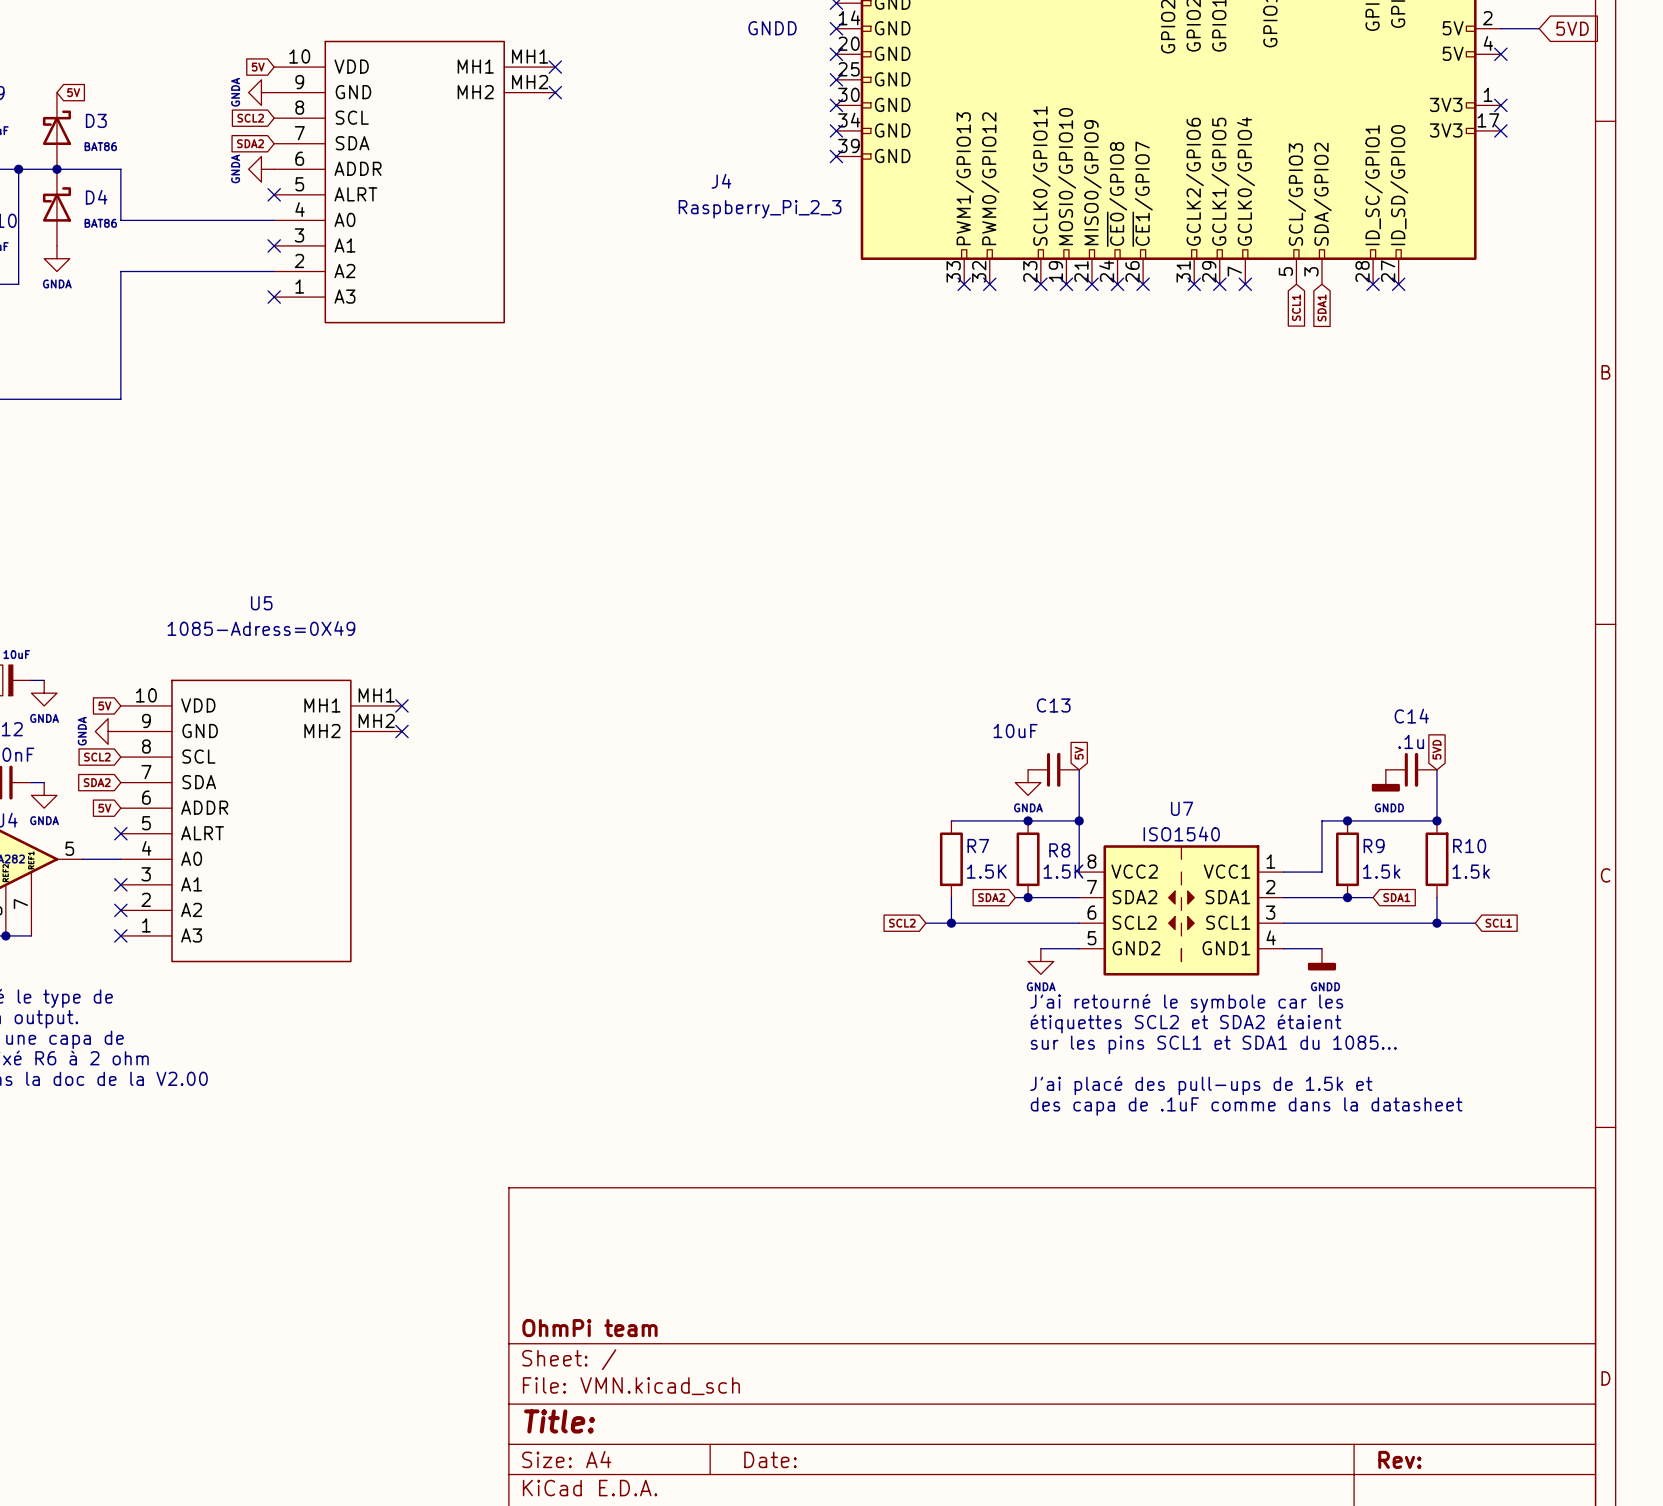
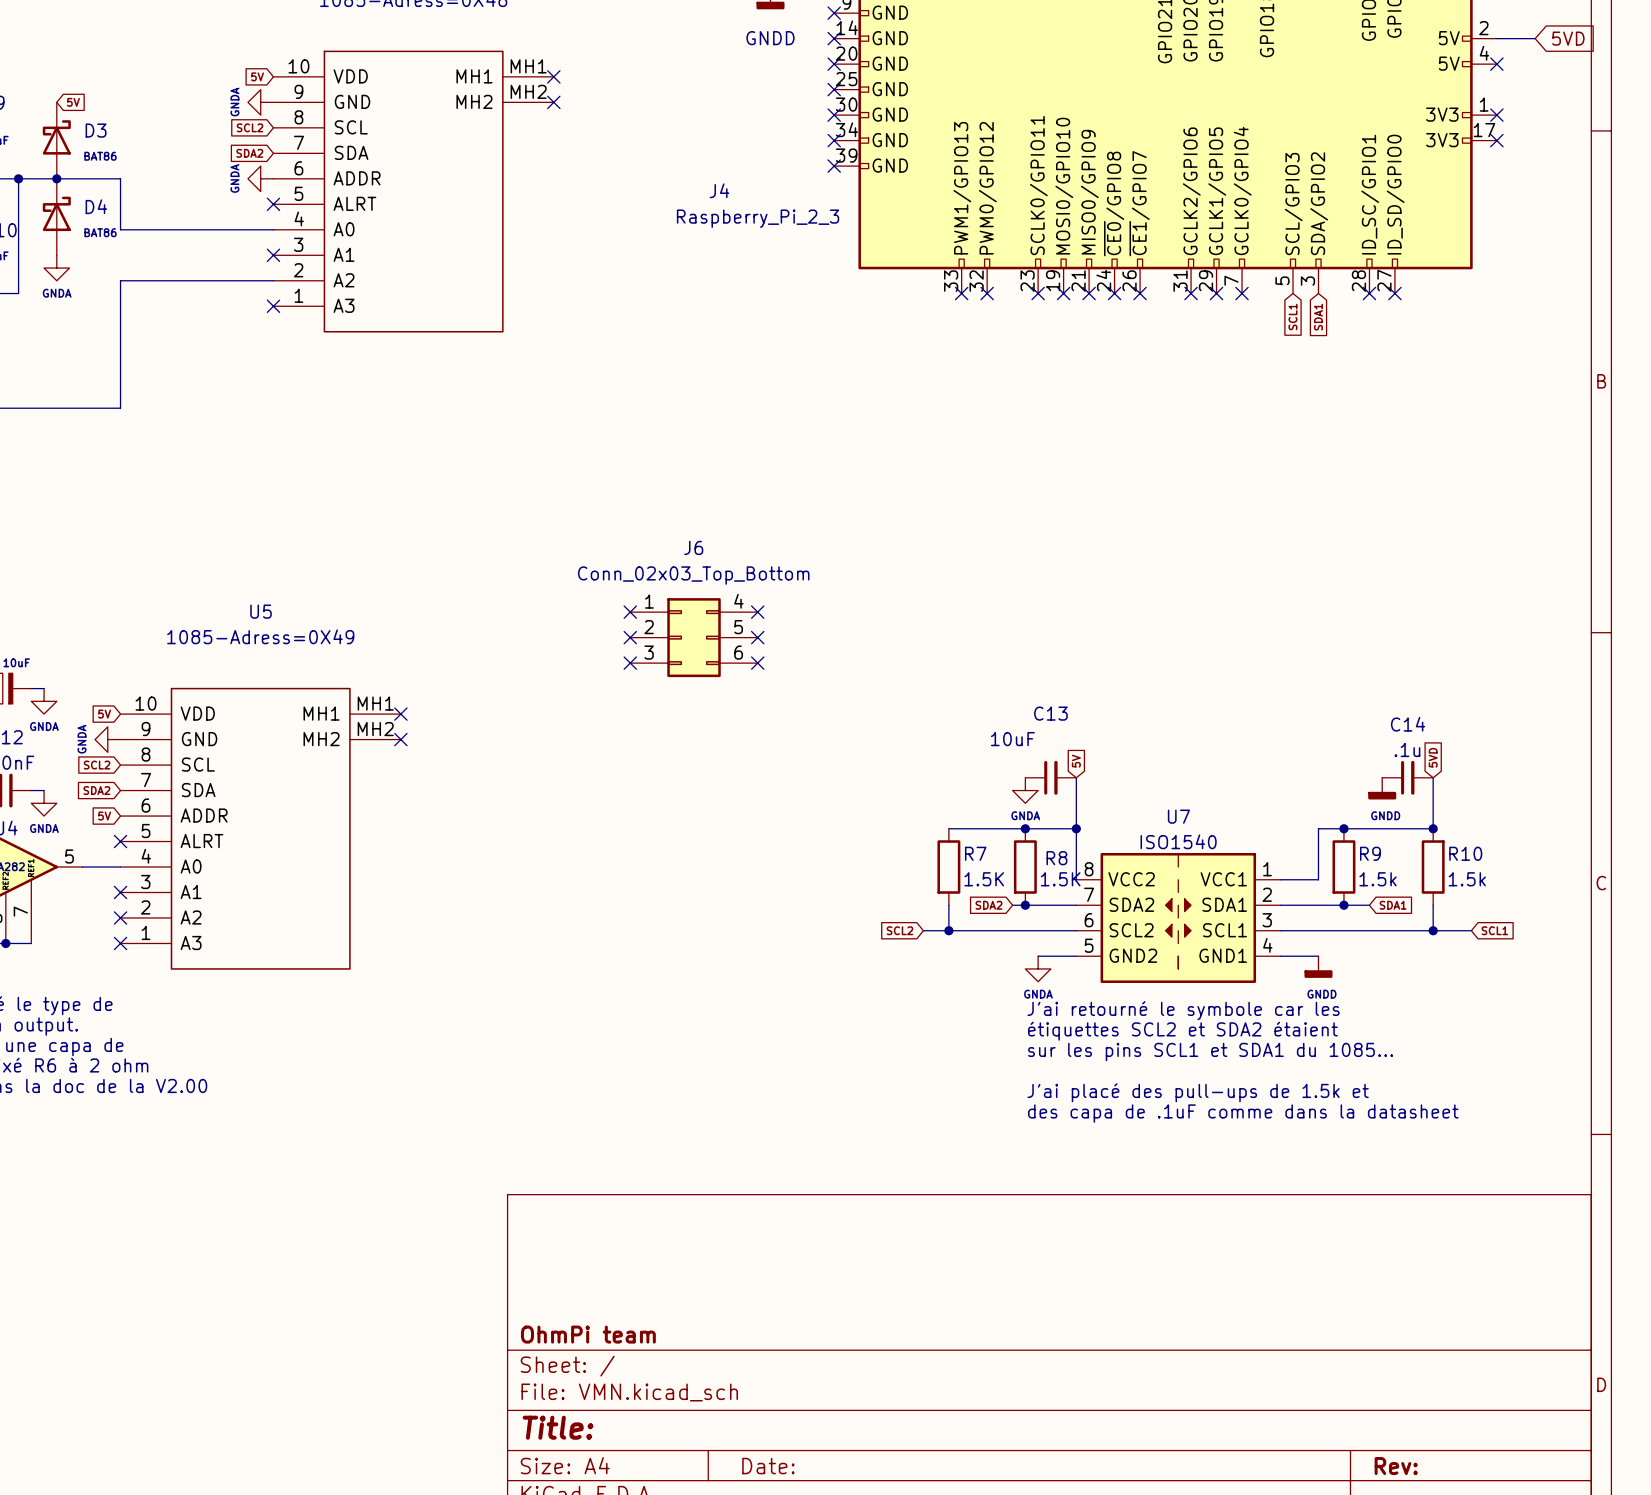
no-connect mark: none -> (630, 612)
no-connect mark: none -> (757, 612)
no-connect mark: none -> (630, 637)
J6: none -> Conn_02x03_Top_Bottom (694, 637)
no-connect mark: none -> (757, 637)
no-connect mark: none -> (630, 663)
no-connect mark: none -> (757, 663)

